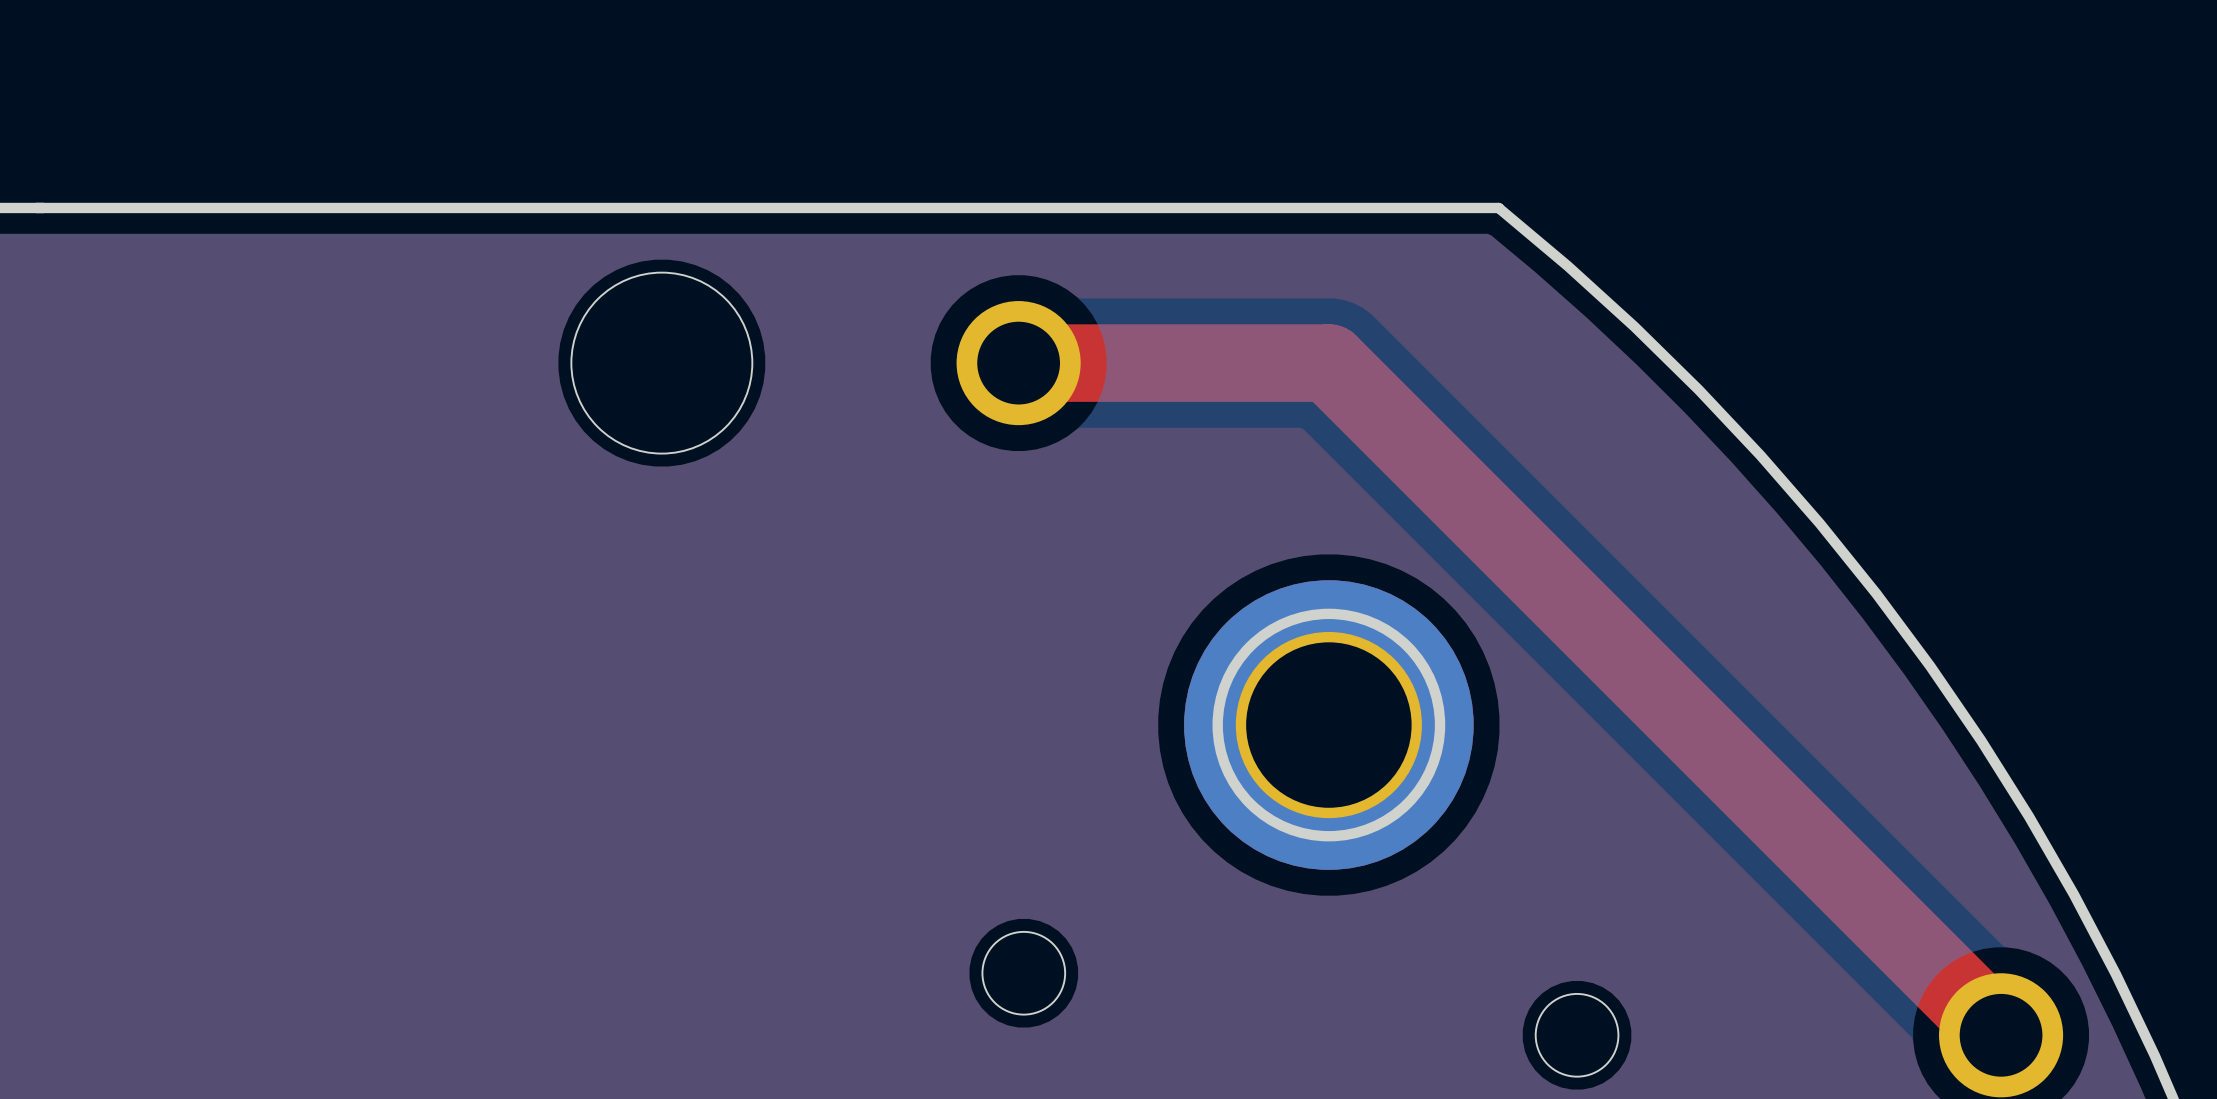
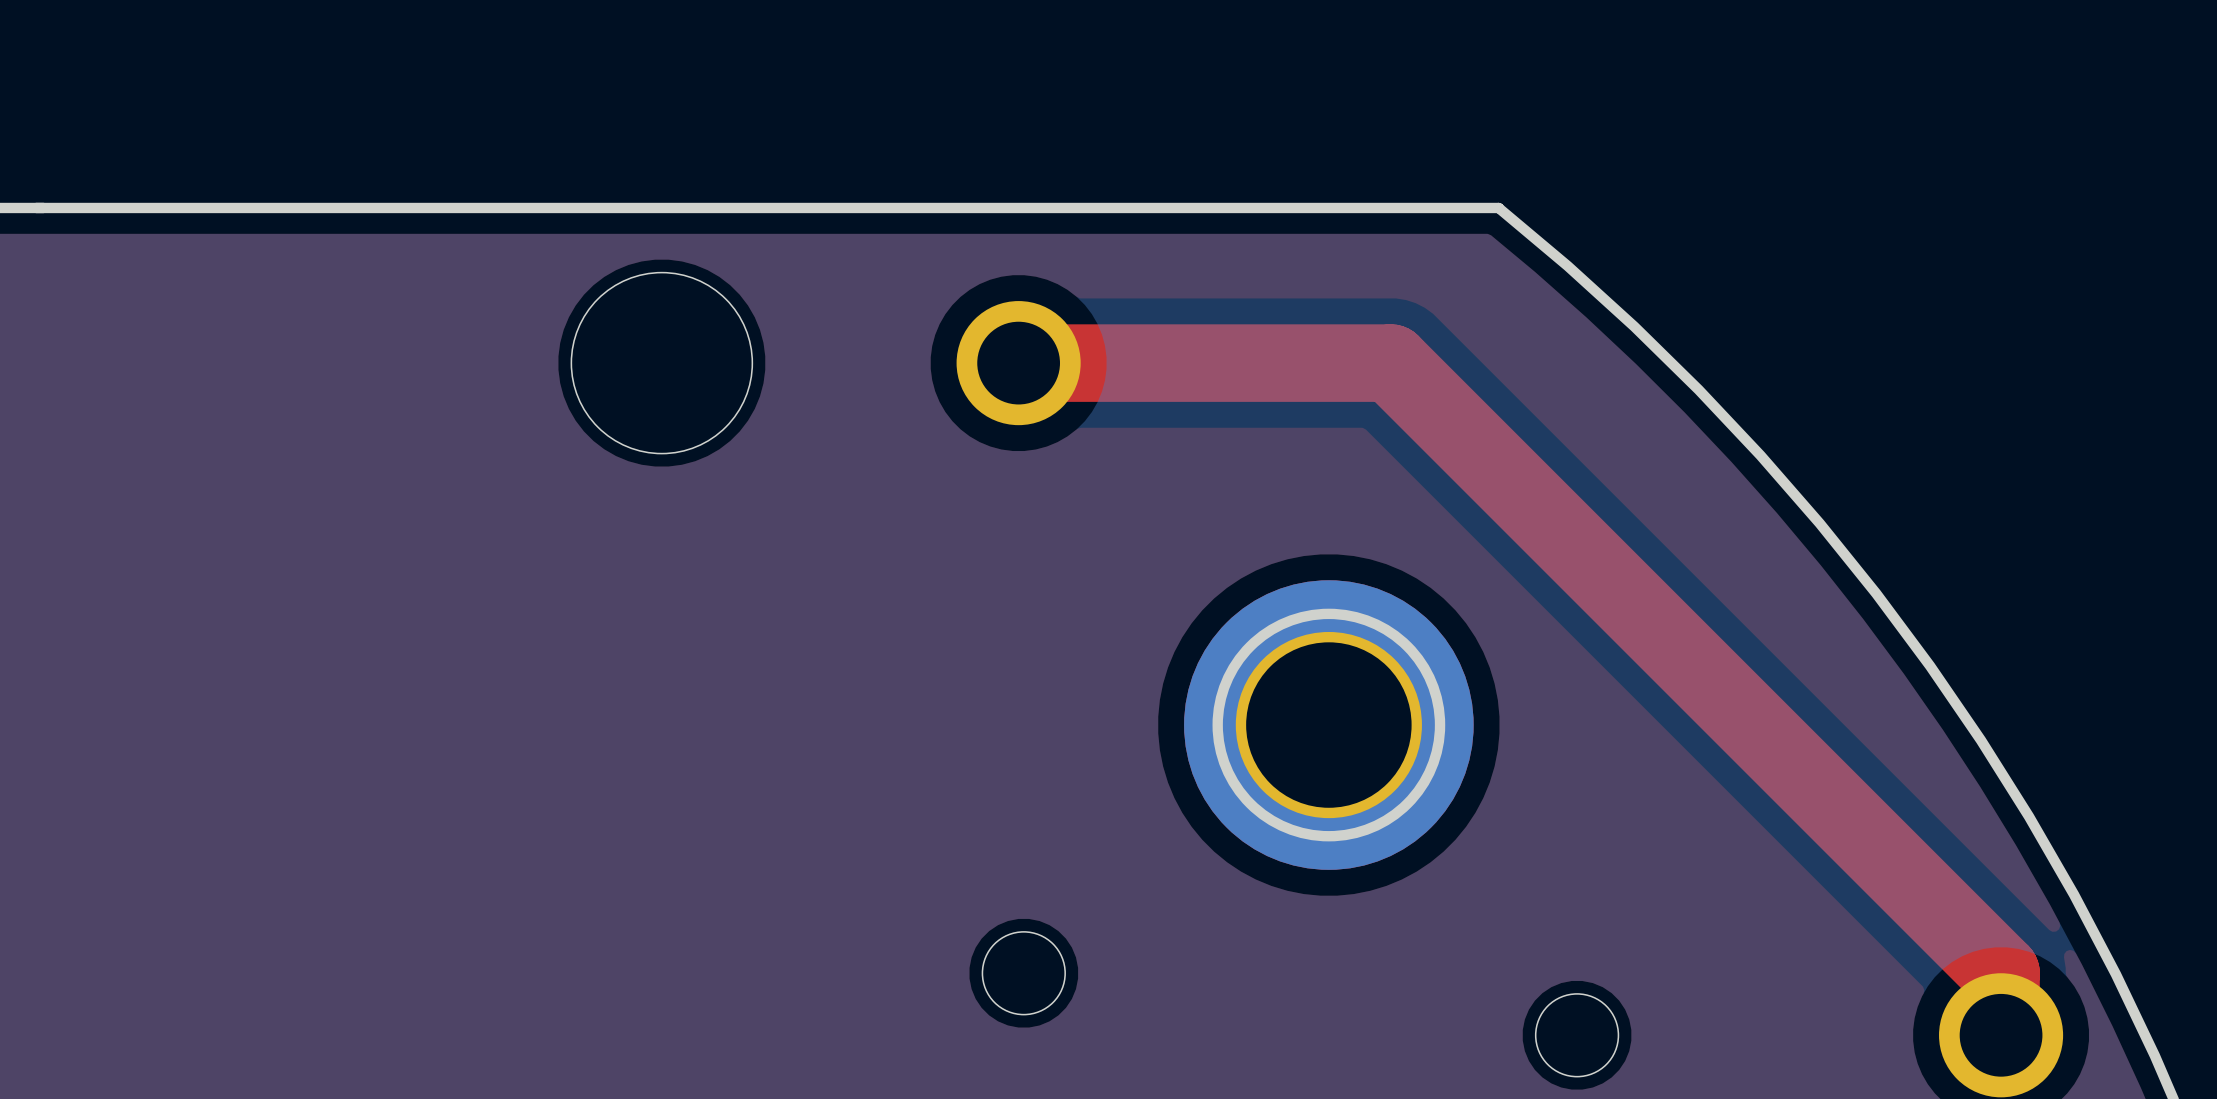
top track: (1328, 363) (2001, 1035) -> (1328, 363) (1390, 363) (2001, 973) (2001, 1035)

